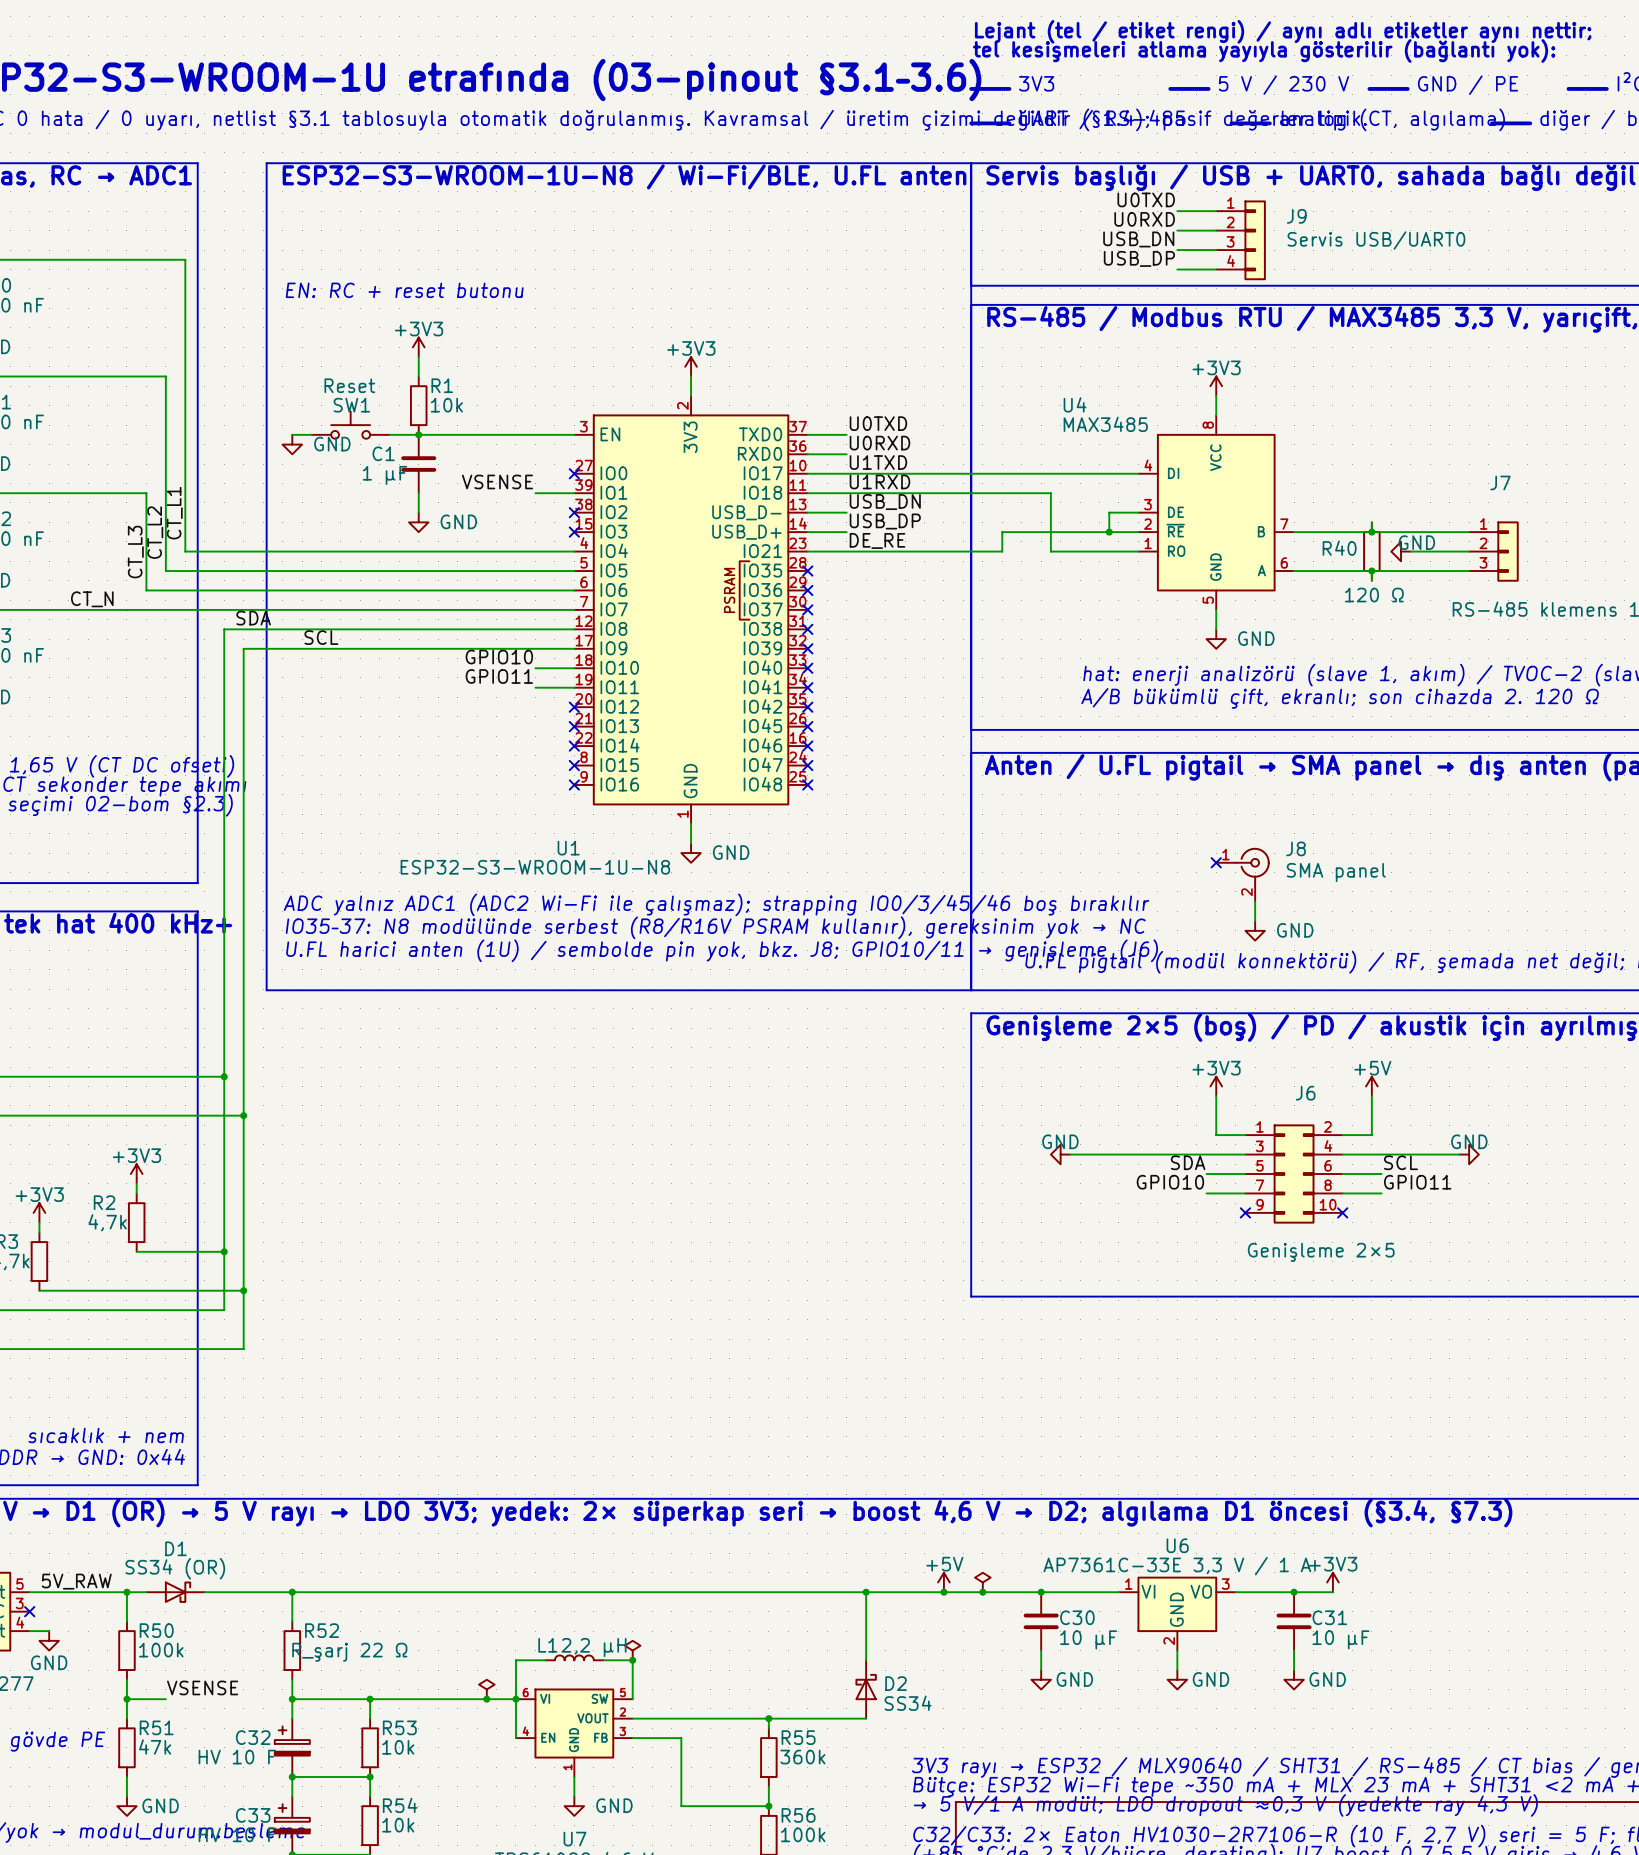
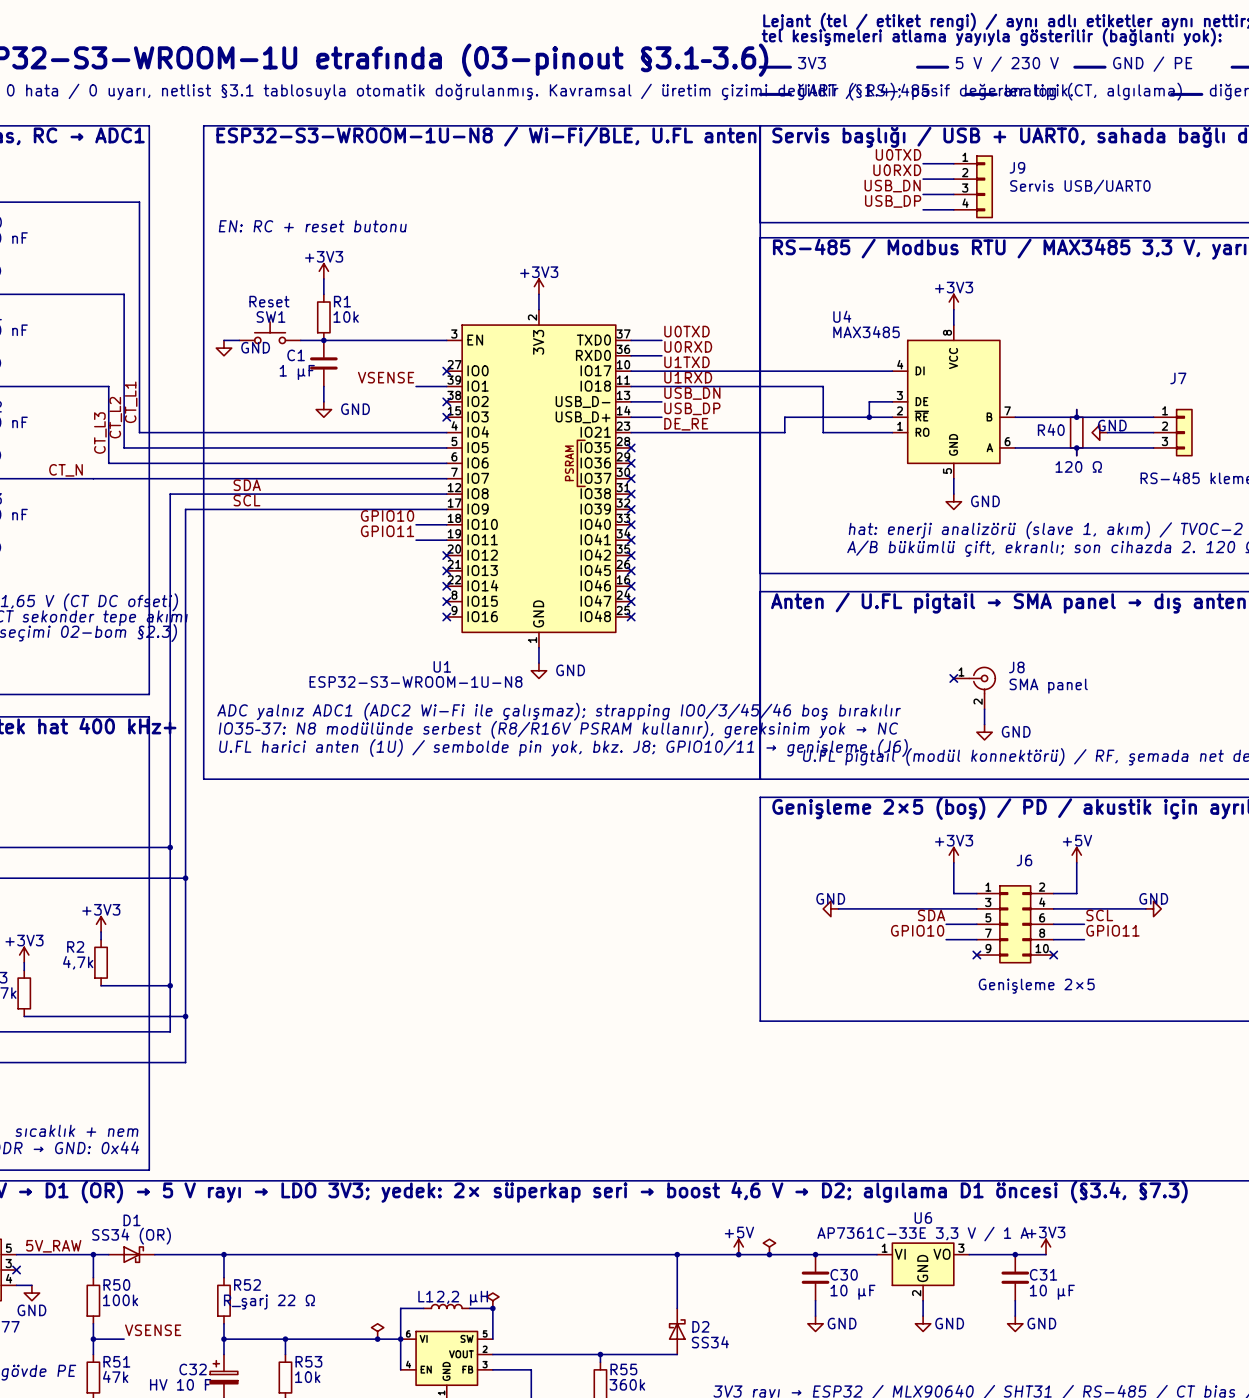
label position: SDA (253, 618) -> SDA (247, 485)

